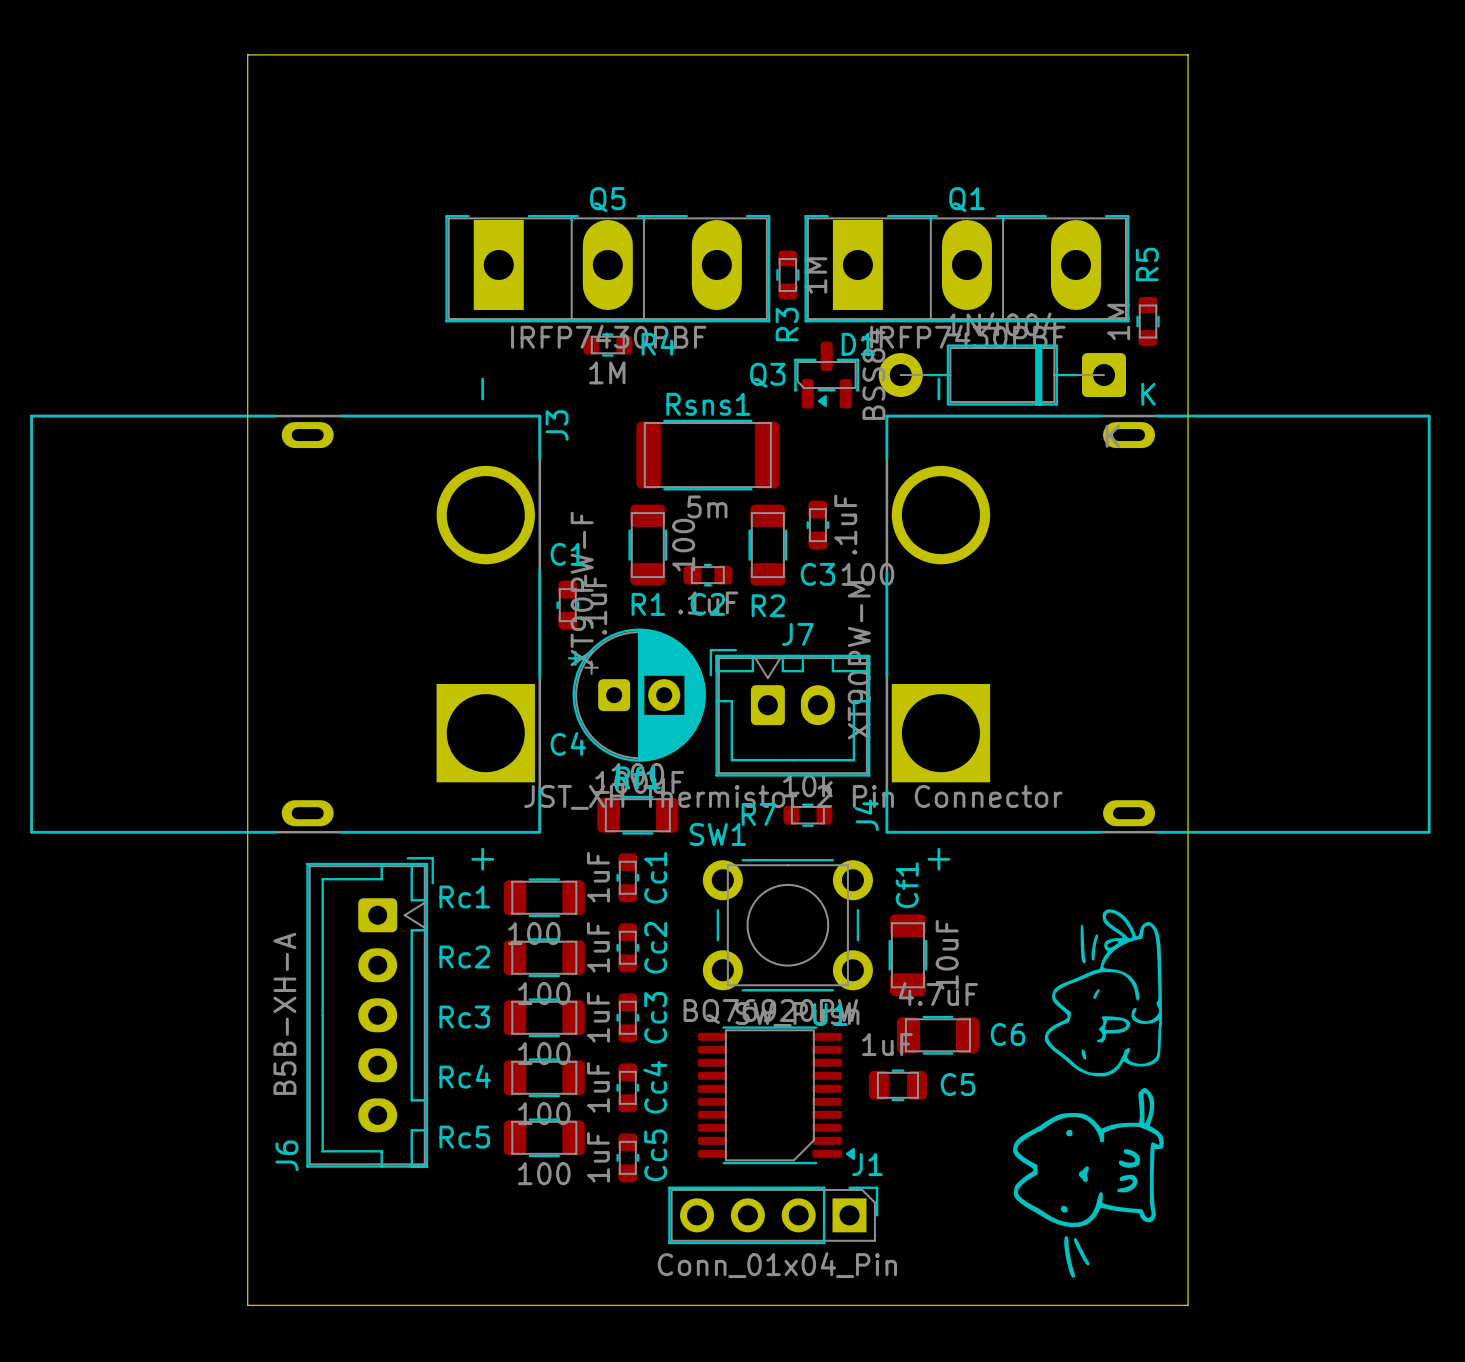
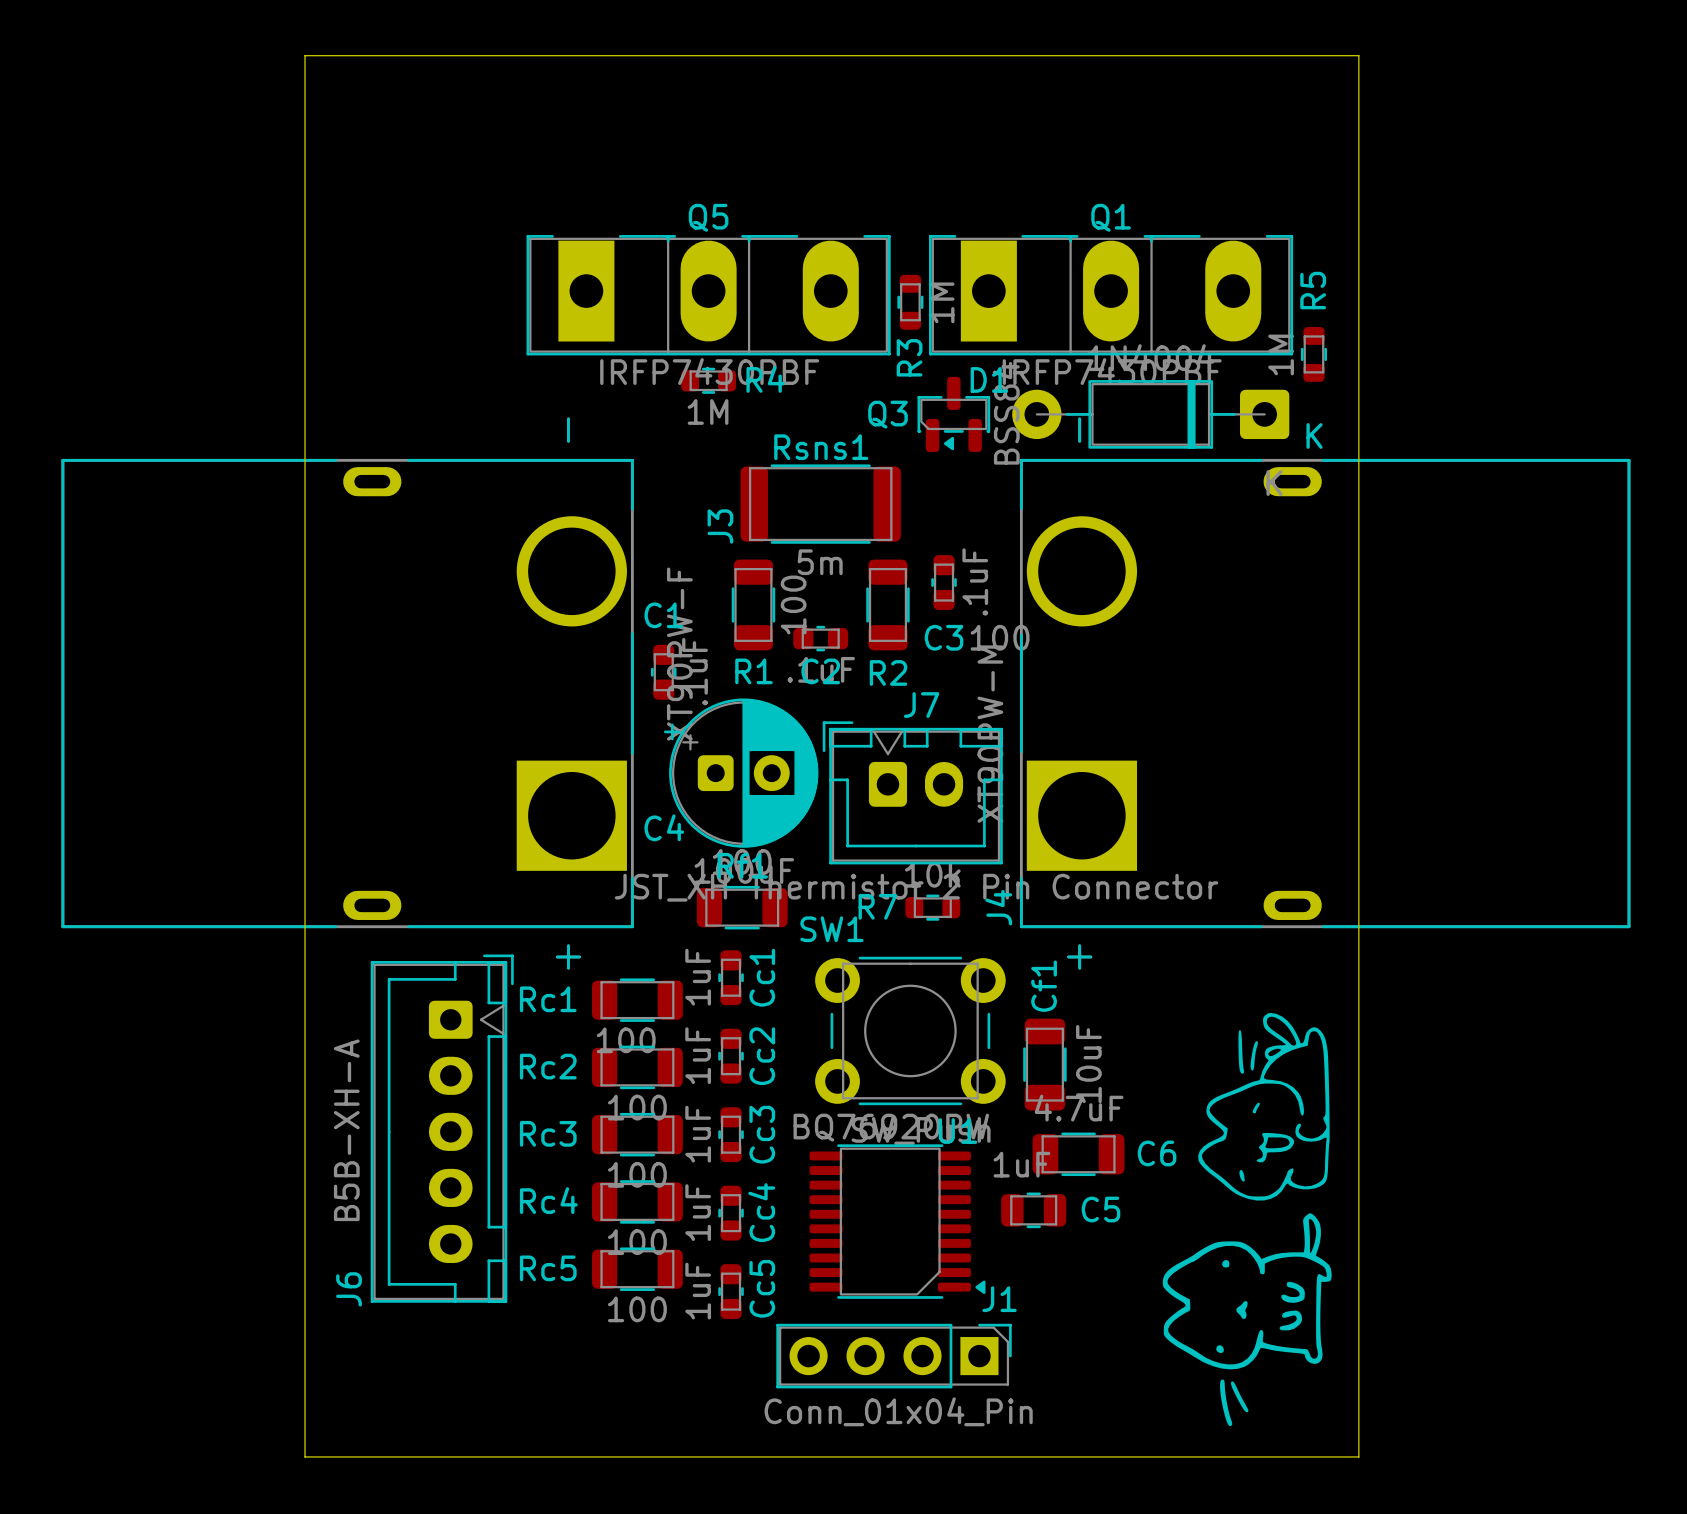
J3 name position: J3 (557, 425) -> J3 (720, 526)

